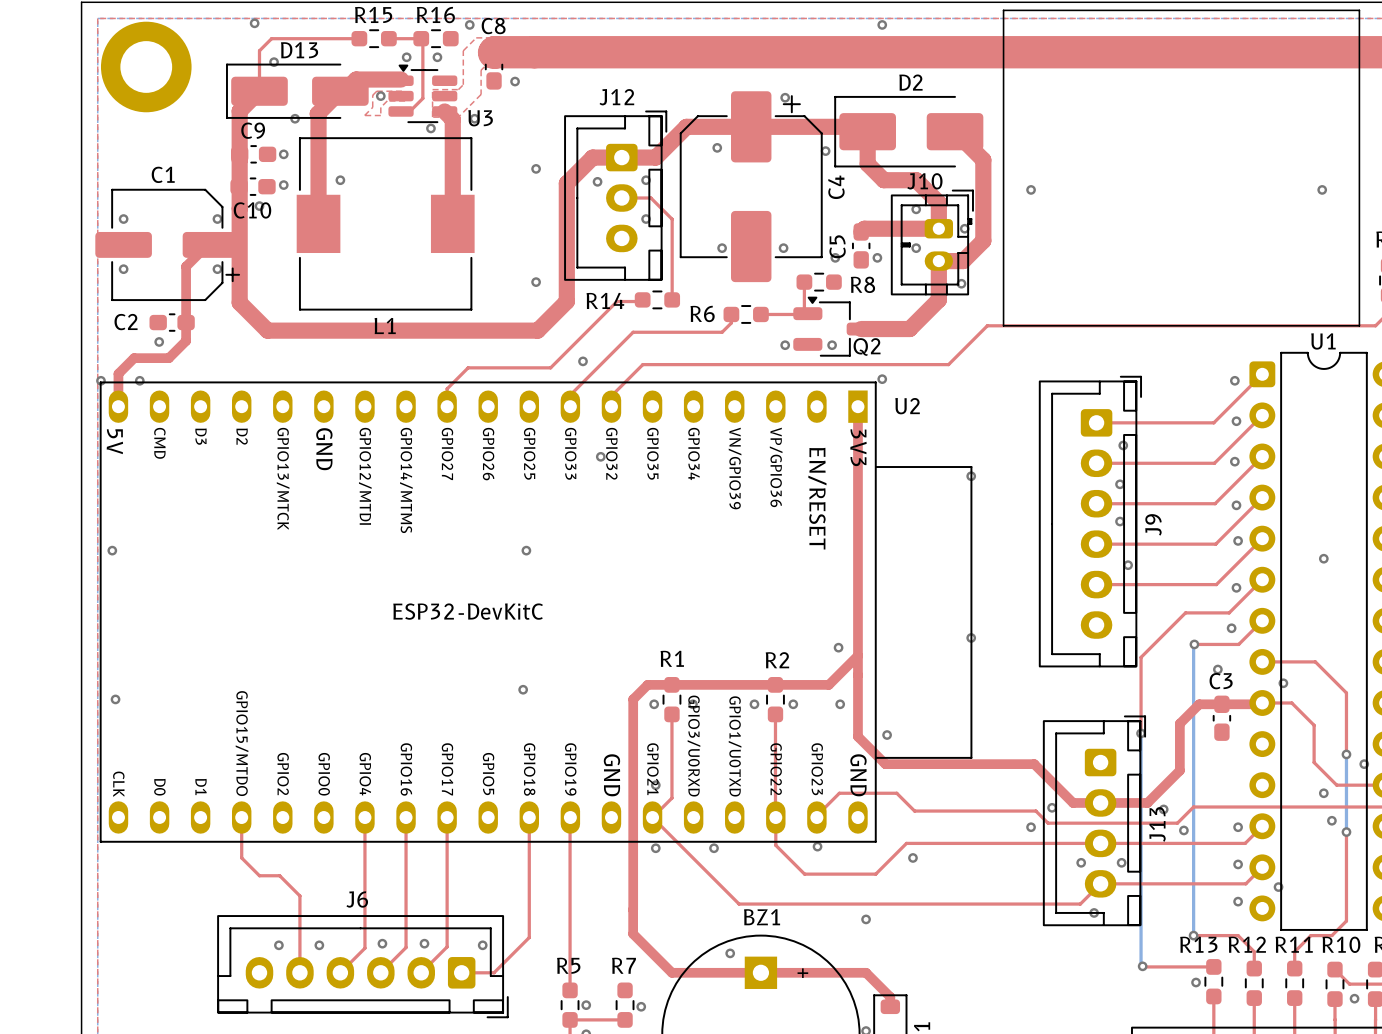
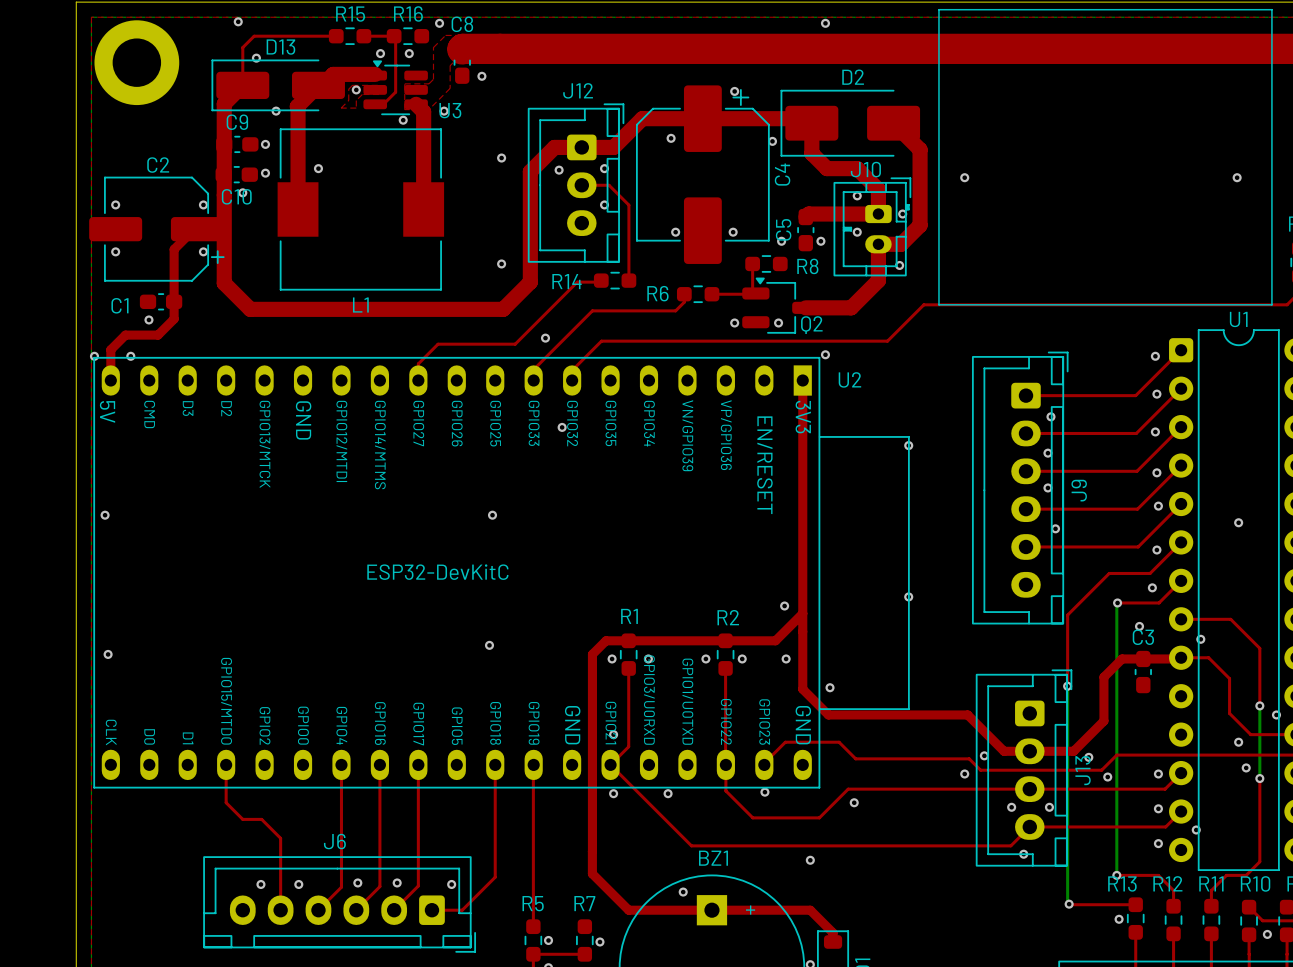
C1 name position: C1 (163, 174) -> C1 (119, 305)
C2 name position: C2 (126, 322) -> C2 (158, 165)

